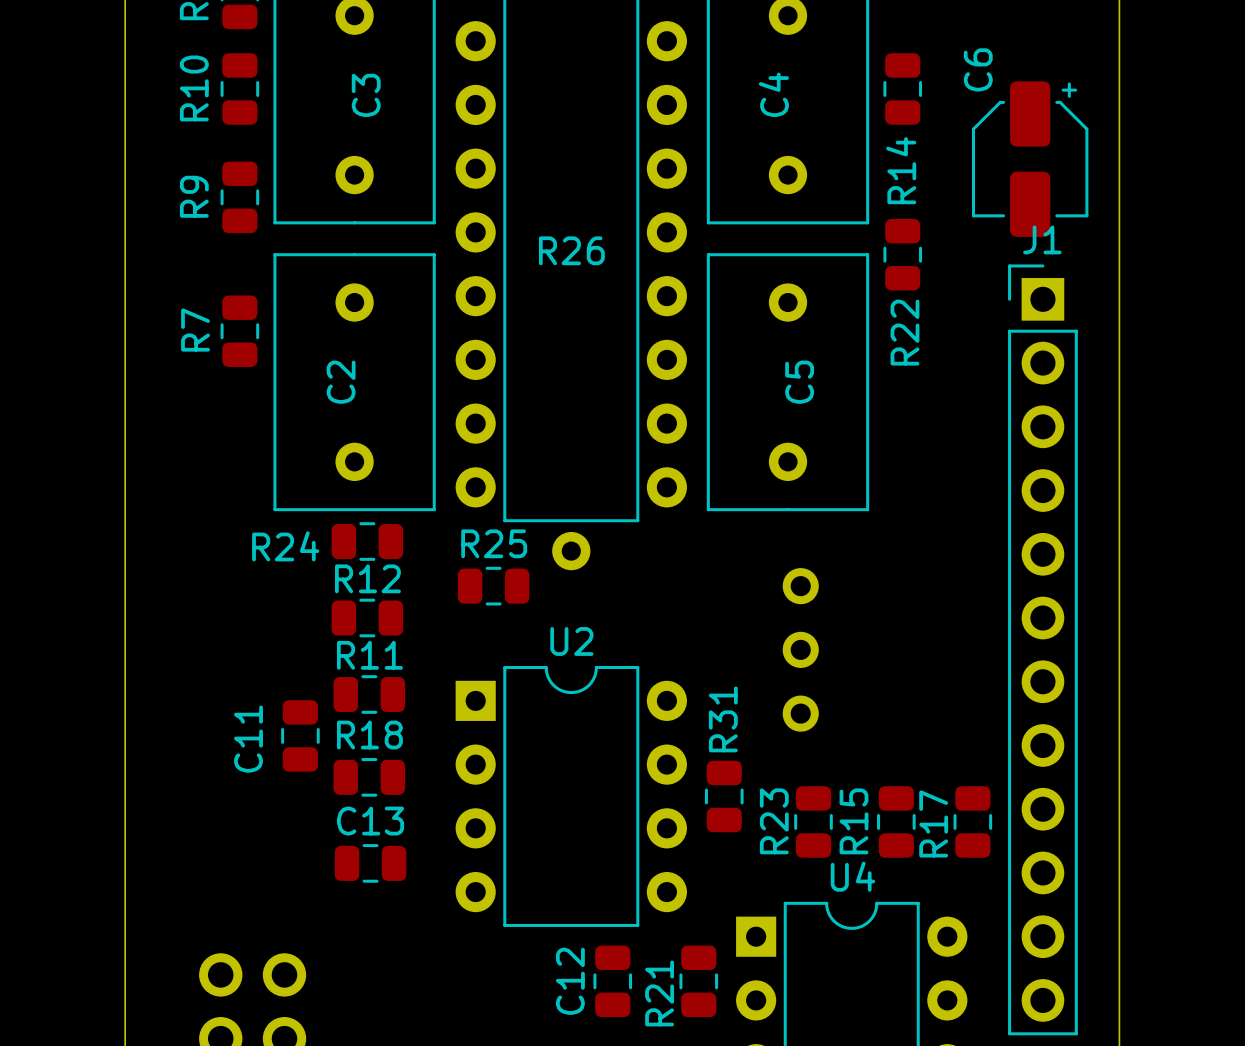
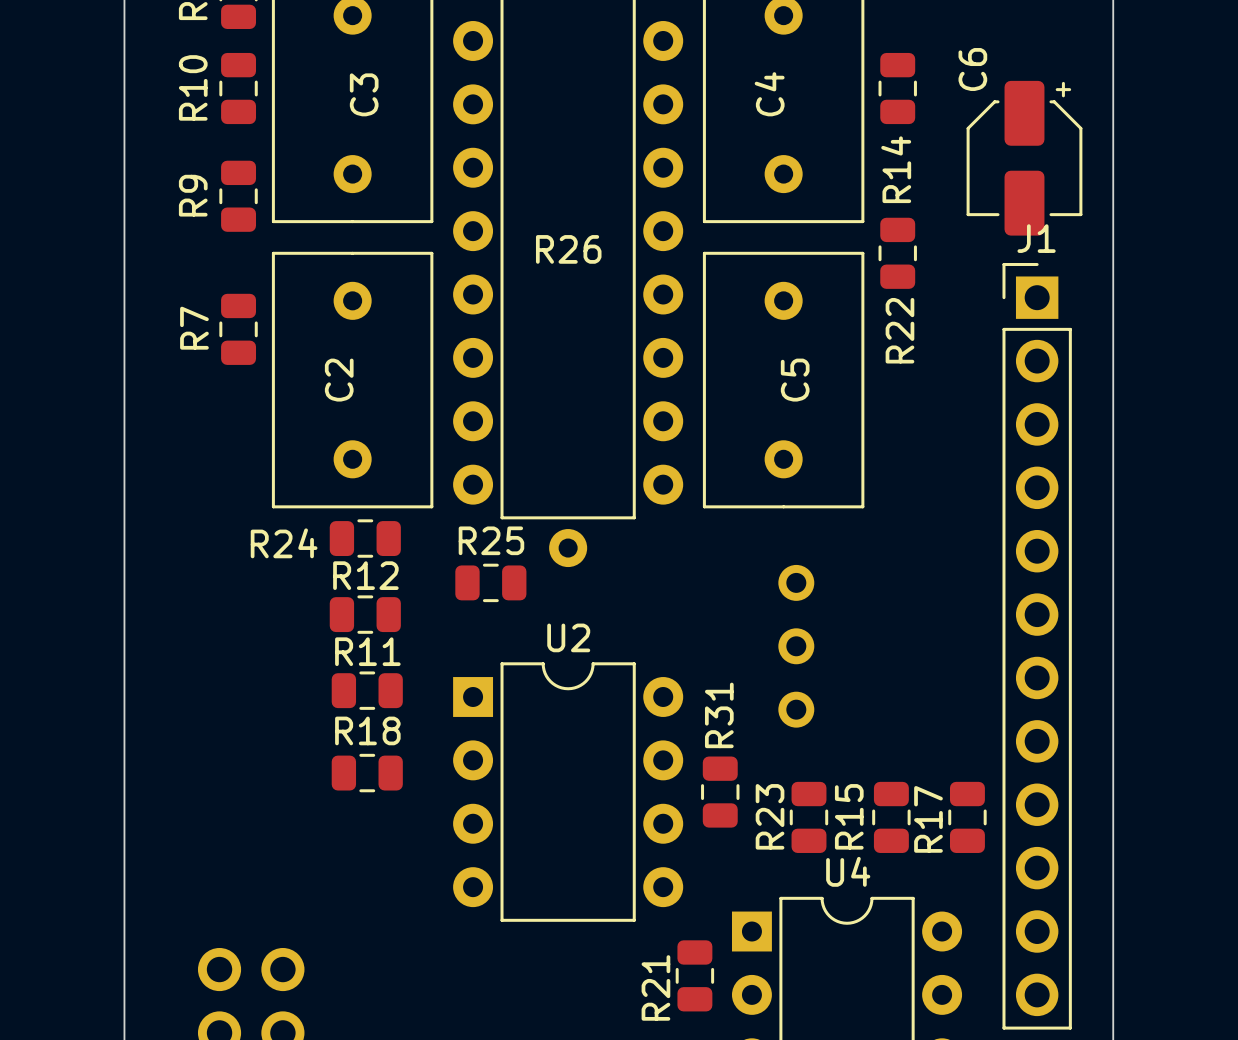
C11: (300, 735) -> none
C13: (370, 863) -> none
C12: (612, 981) -> none

